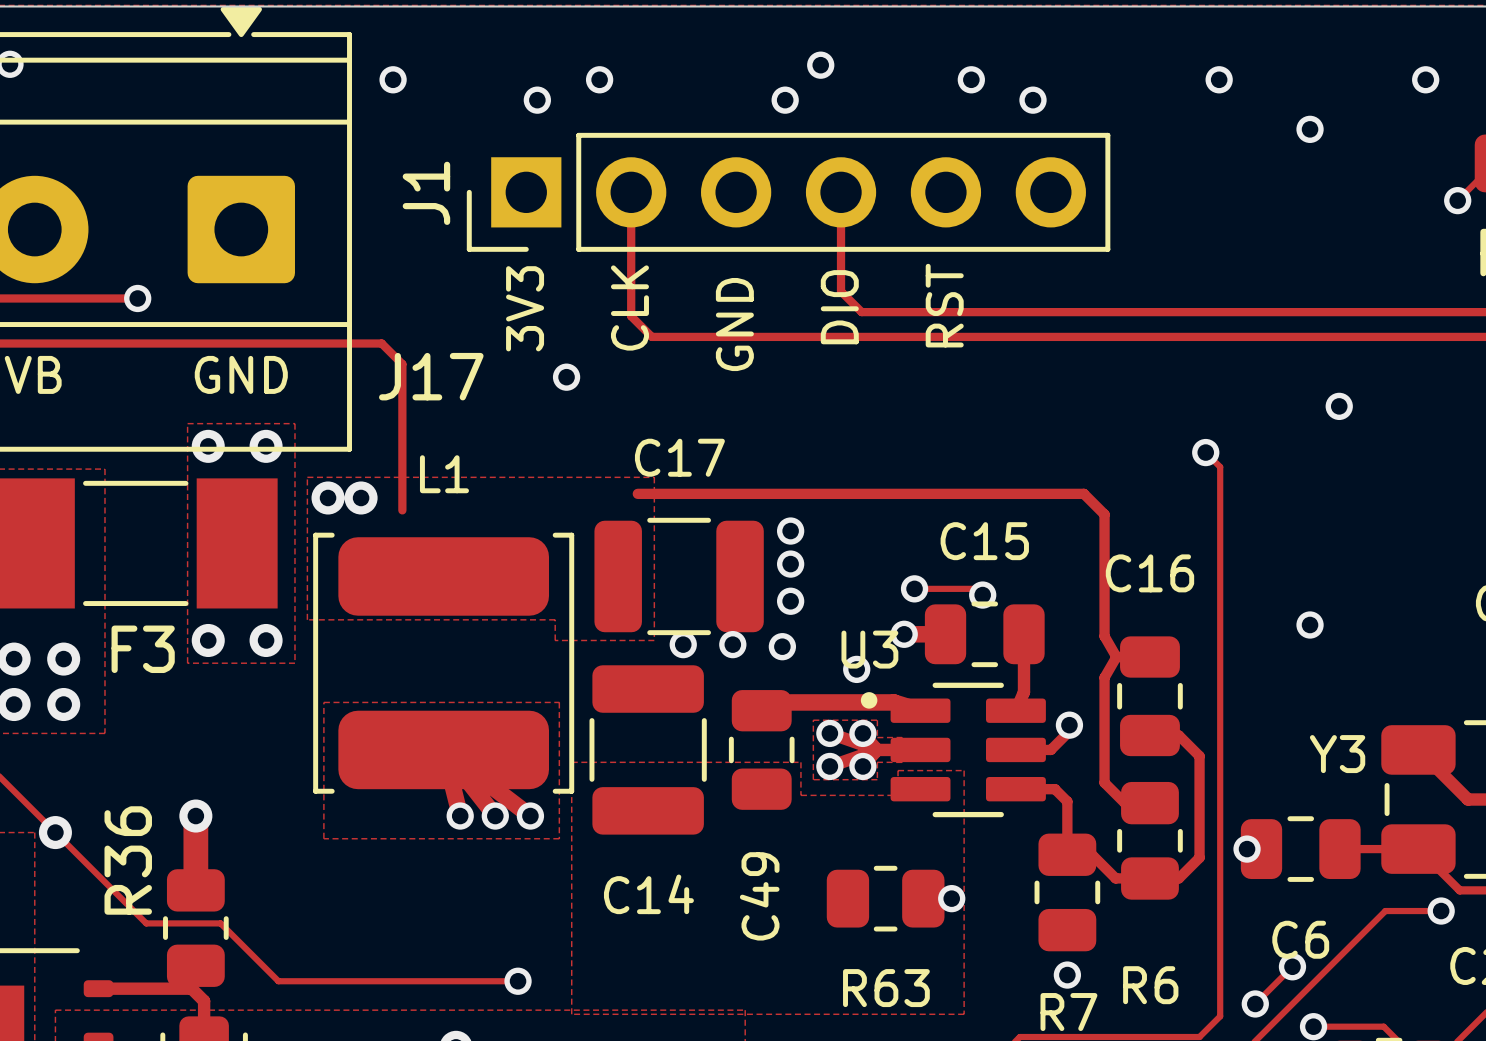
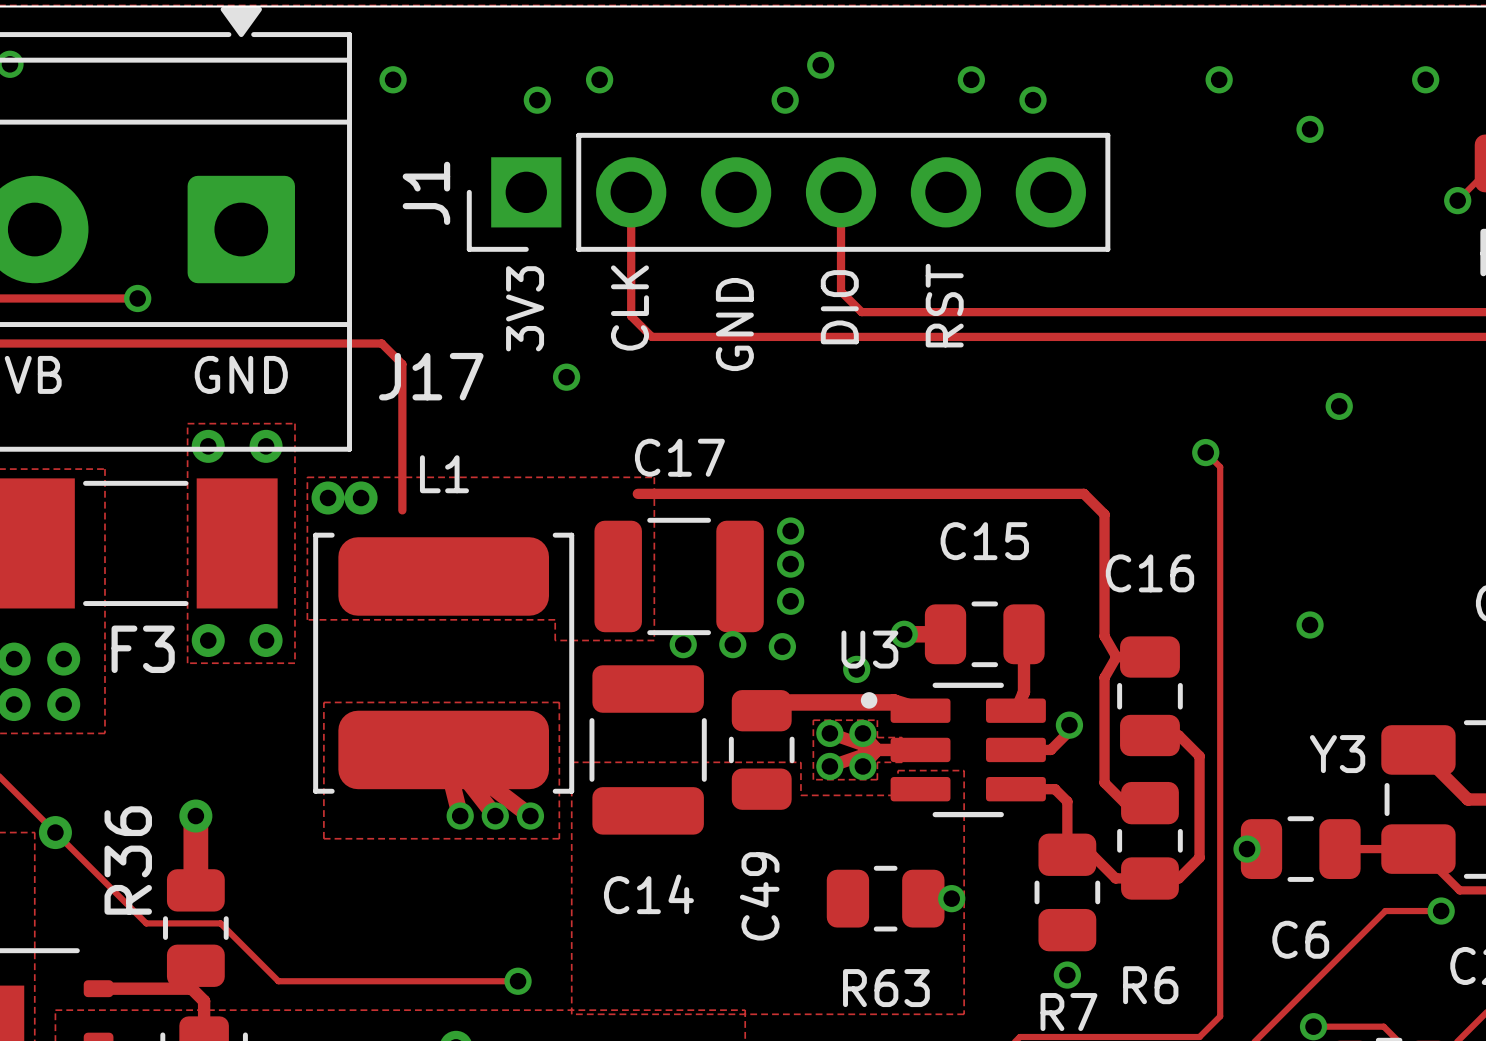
track: (914, 588) (976, 588) (982, 595) -> none
via: (914, 588) -> none
via: (982, 595) -> none
track: (1292, 966) (1255, 1003) -> none
via: (1292, 966) -> none
via: (1255, 1003) -> none

